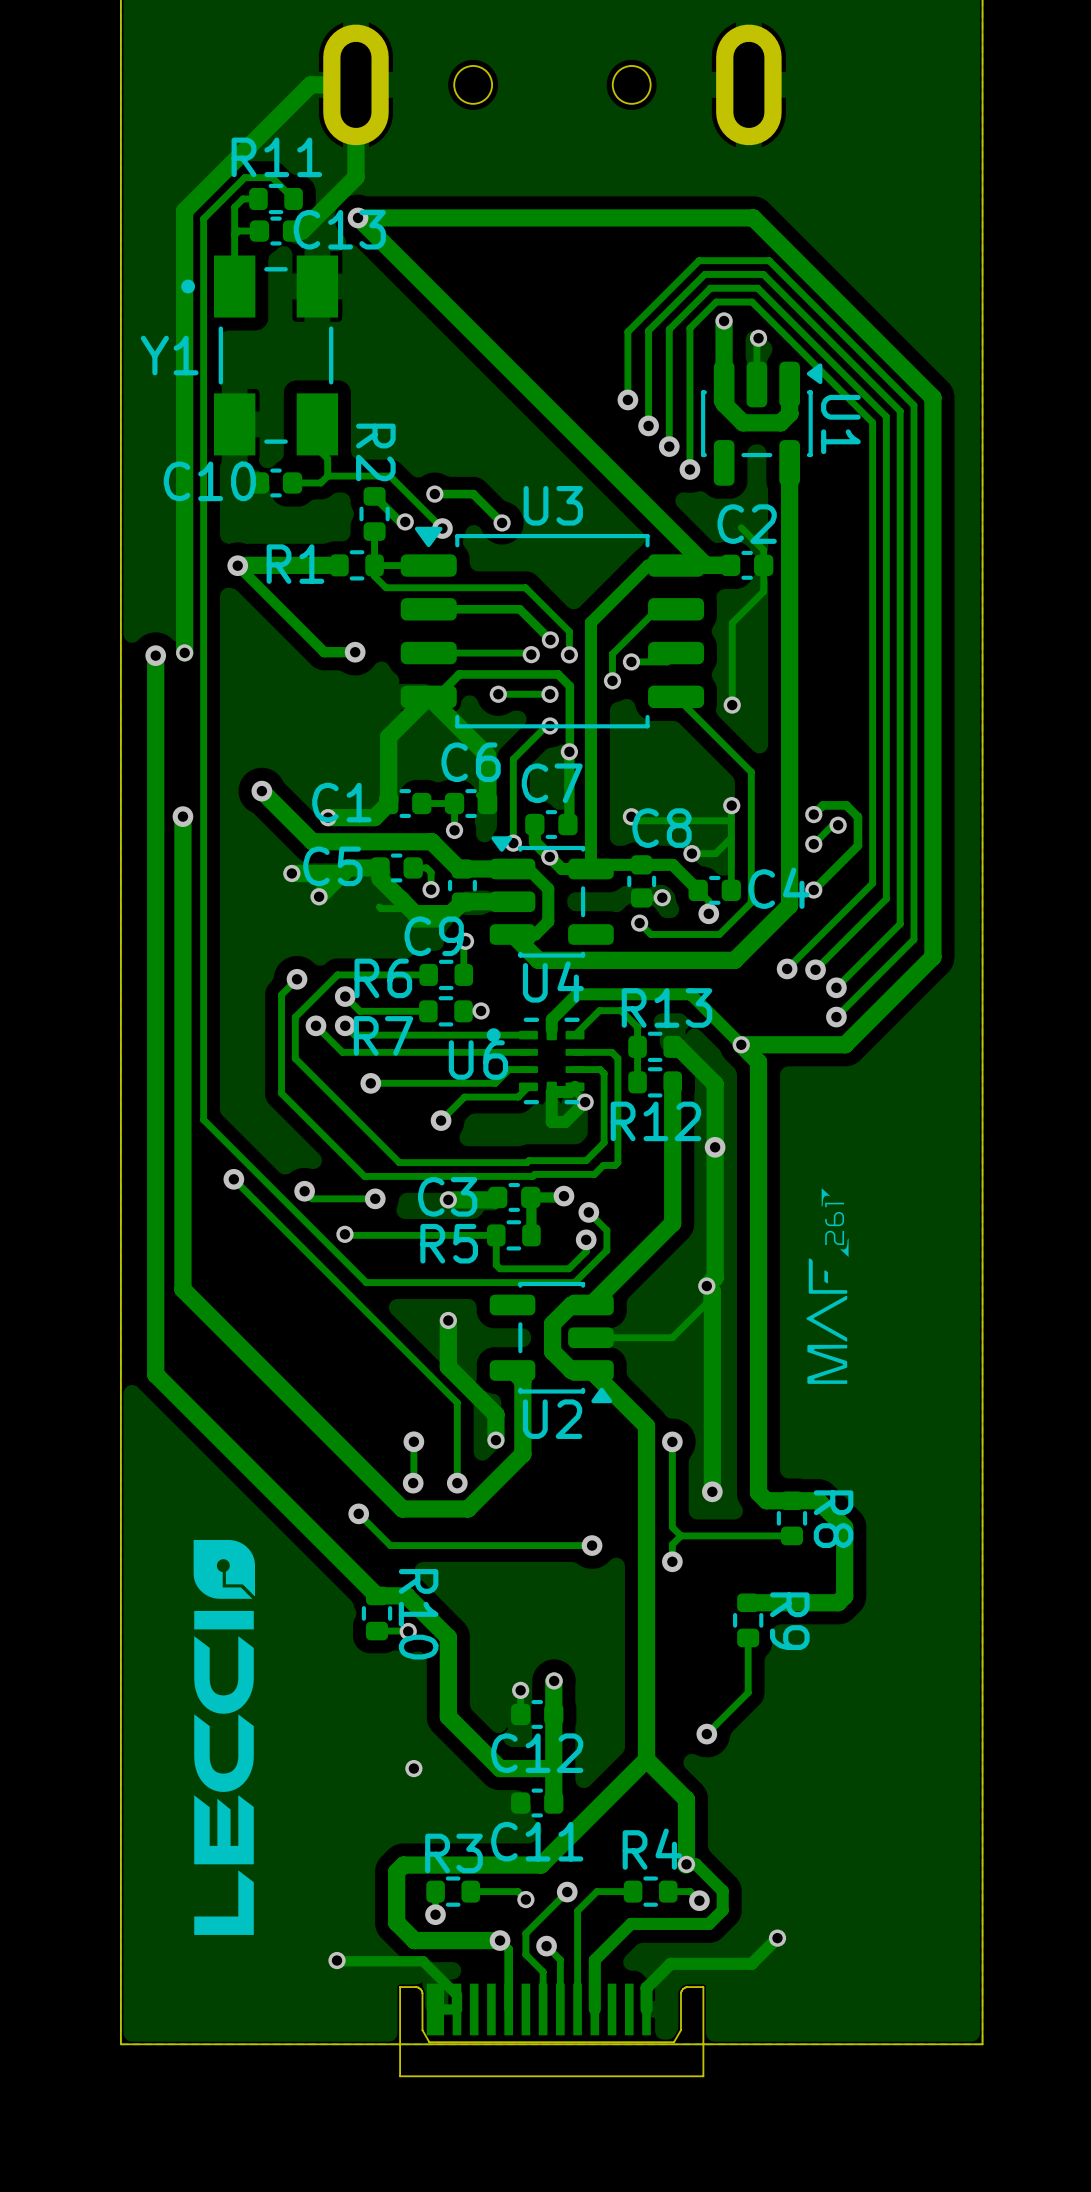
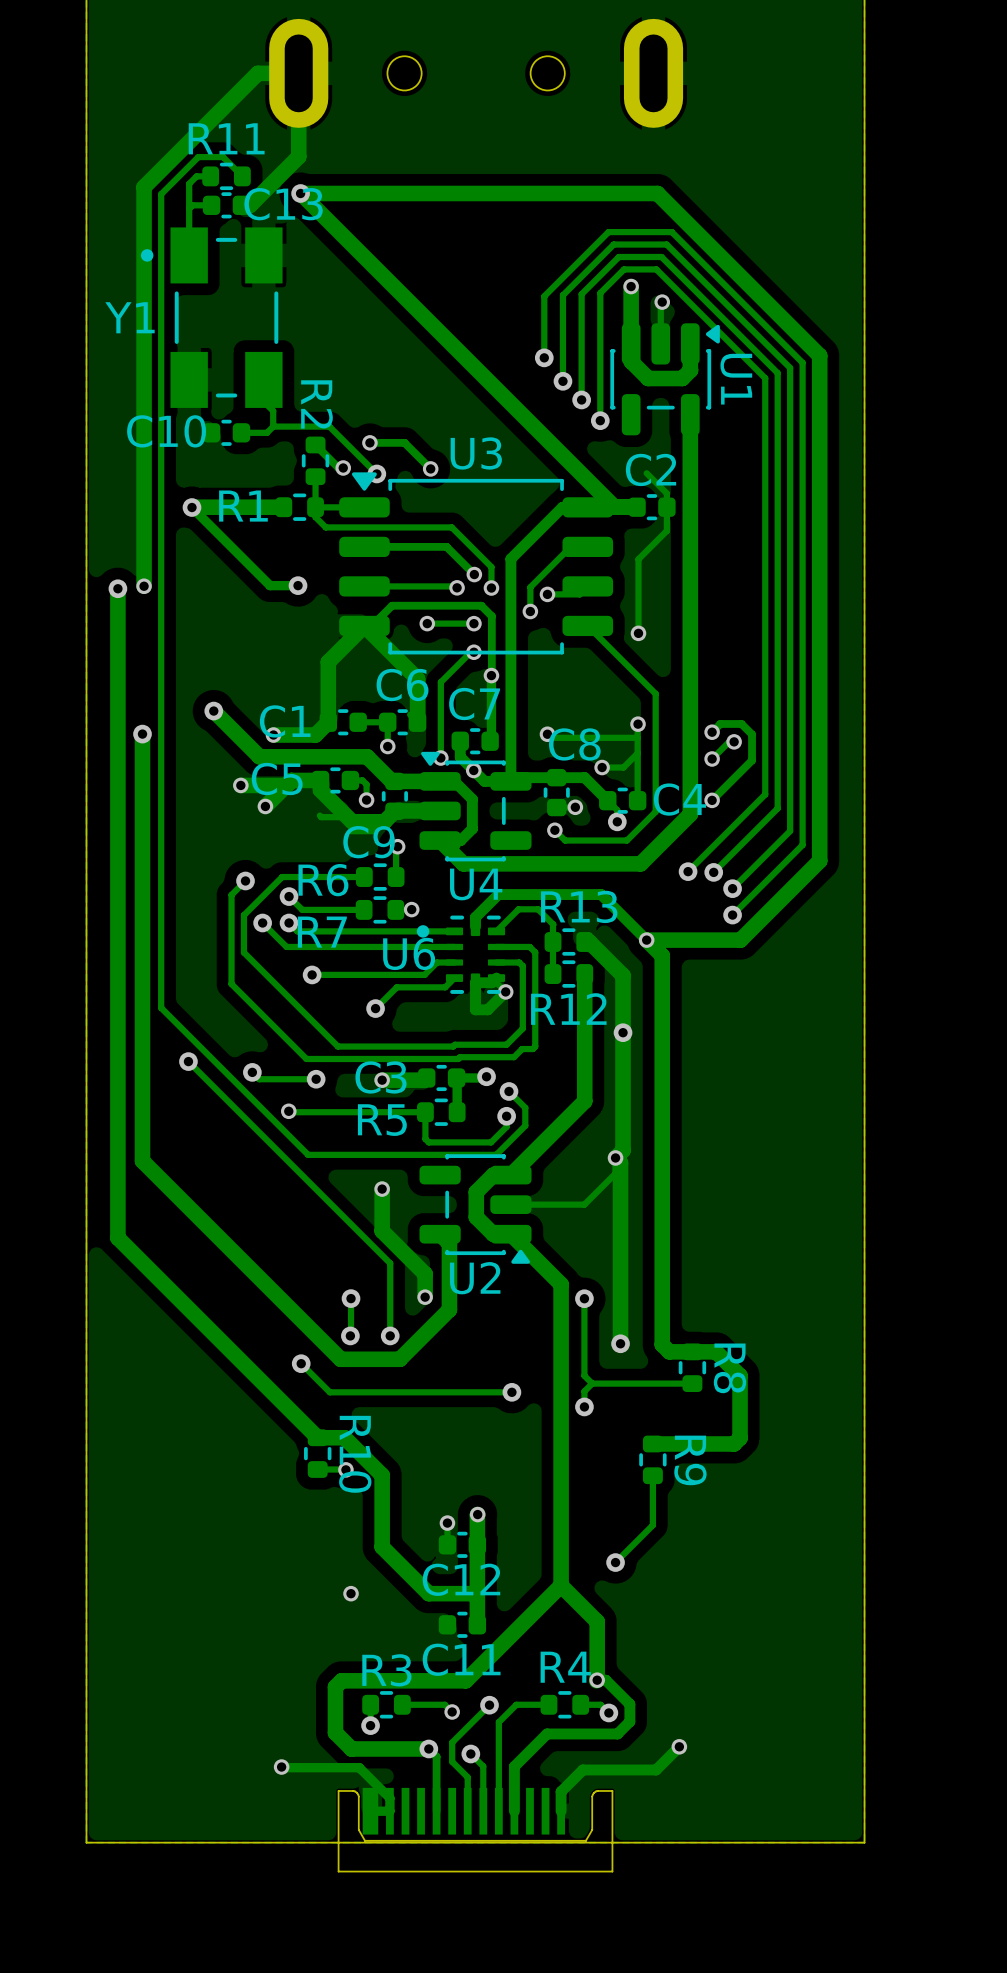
drawing: [806, 1188, 849, 1384] -> none
drawing: [193, 1539, 255, 1935] -> none

